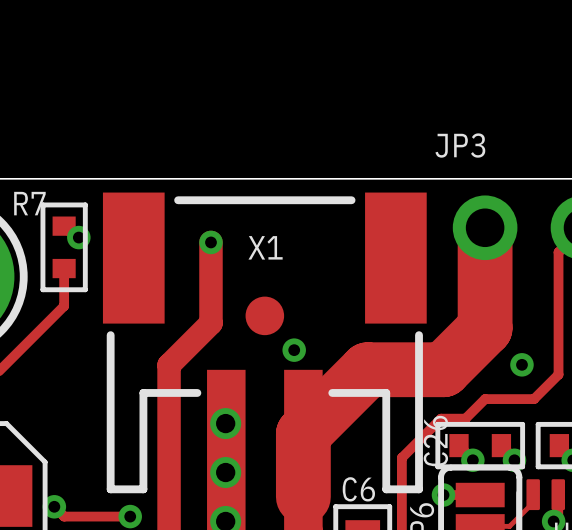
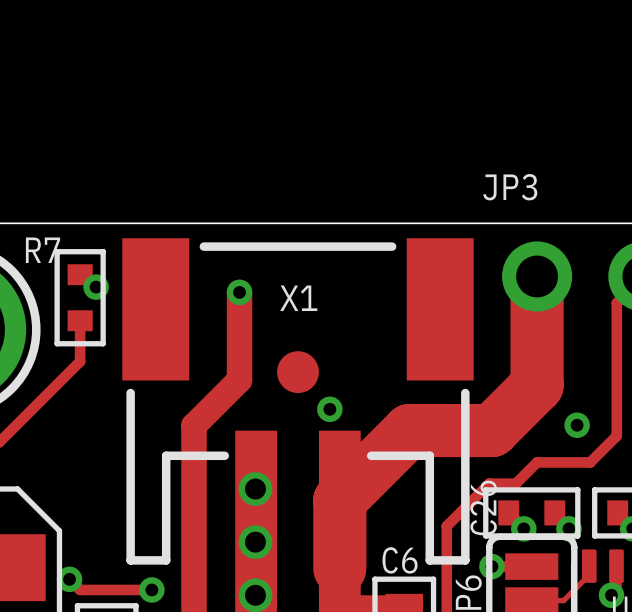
track width: thick (485, 227) (485, 328) (443, 369) (367, 369) (303, 433) (303, 496) -> thin (537, 276) (537, 385) (491, 430) (409, 430) (339, 500) (339, 568)

